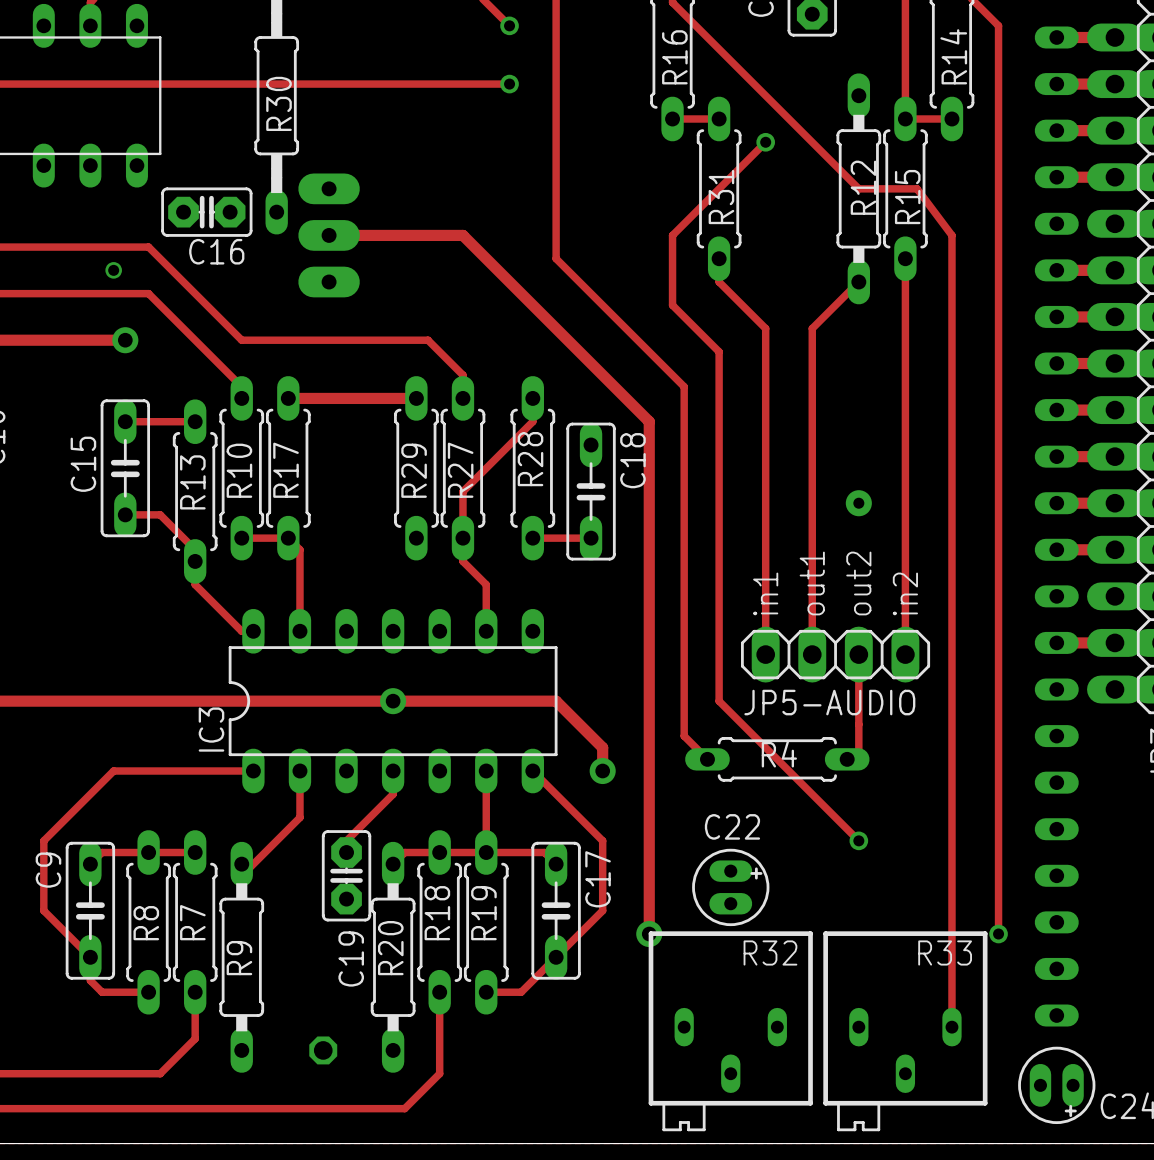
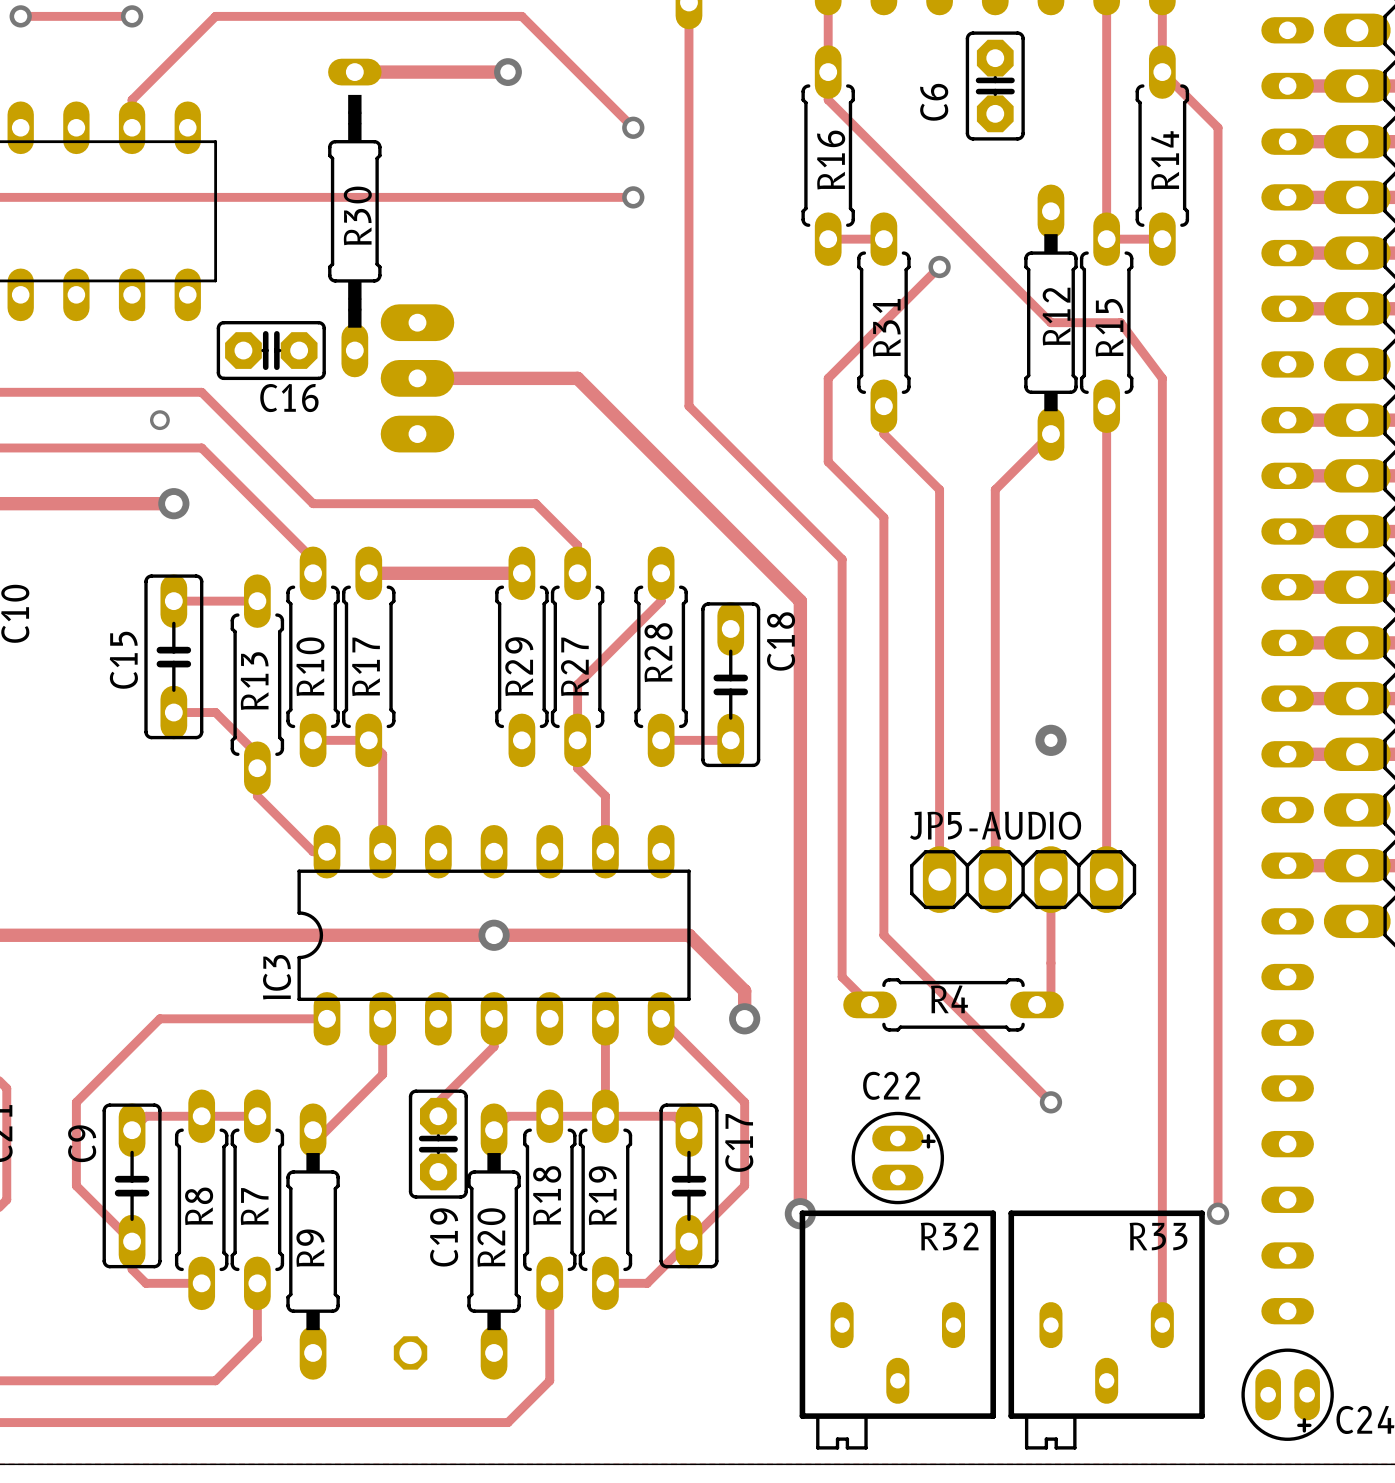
via position: (858, 503) -> (1050, 740)
text: out1 (812, 583) -> none
text: out2 (858, 583) -> none
text: in1 (765, 593) -> none
text: in2 (905, 593) -> none
JP5-AUDIO name position: JP5-AUDIO (829, 702) -> JP5-AUDIO (995, 825)

